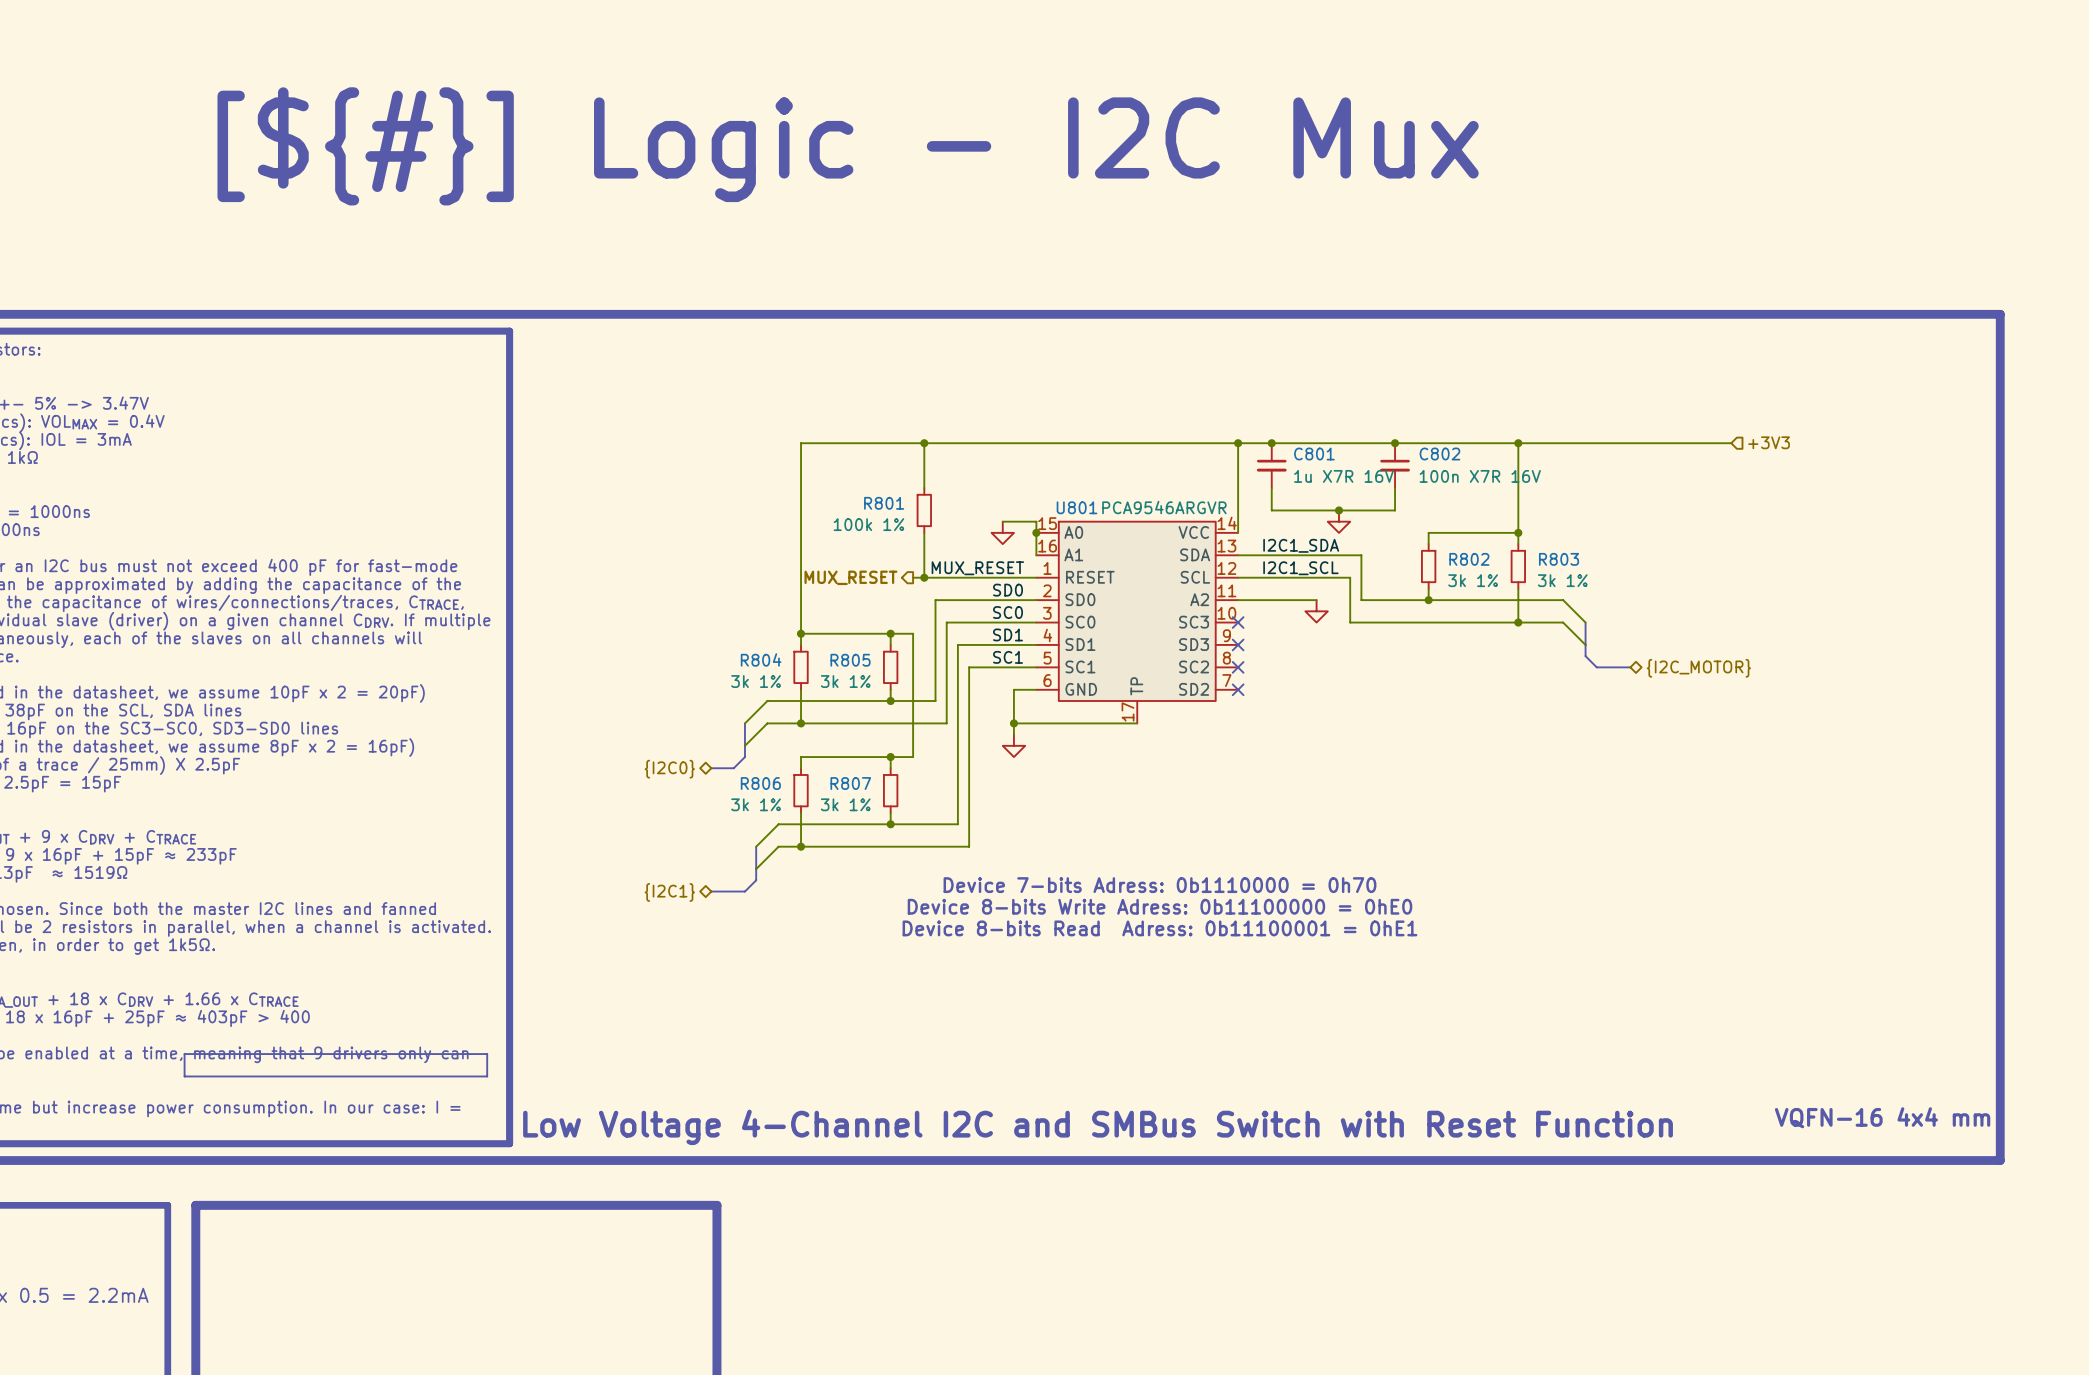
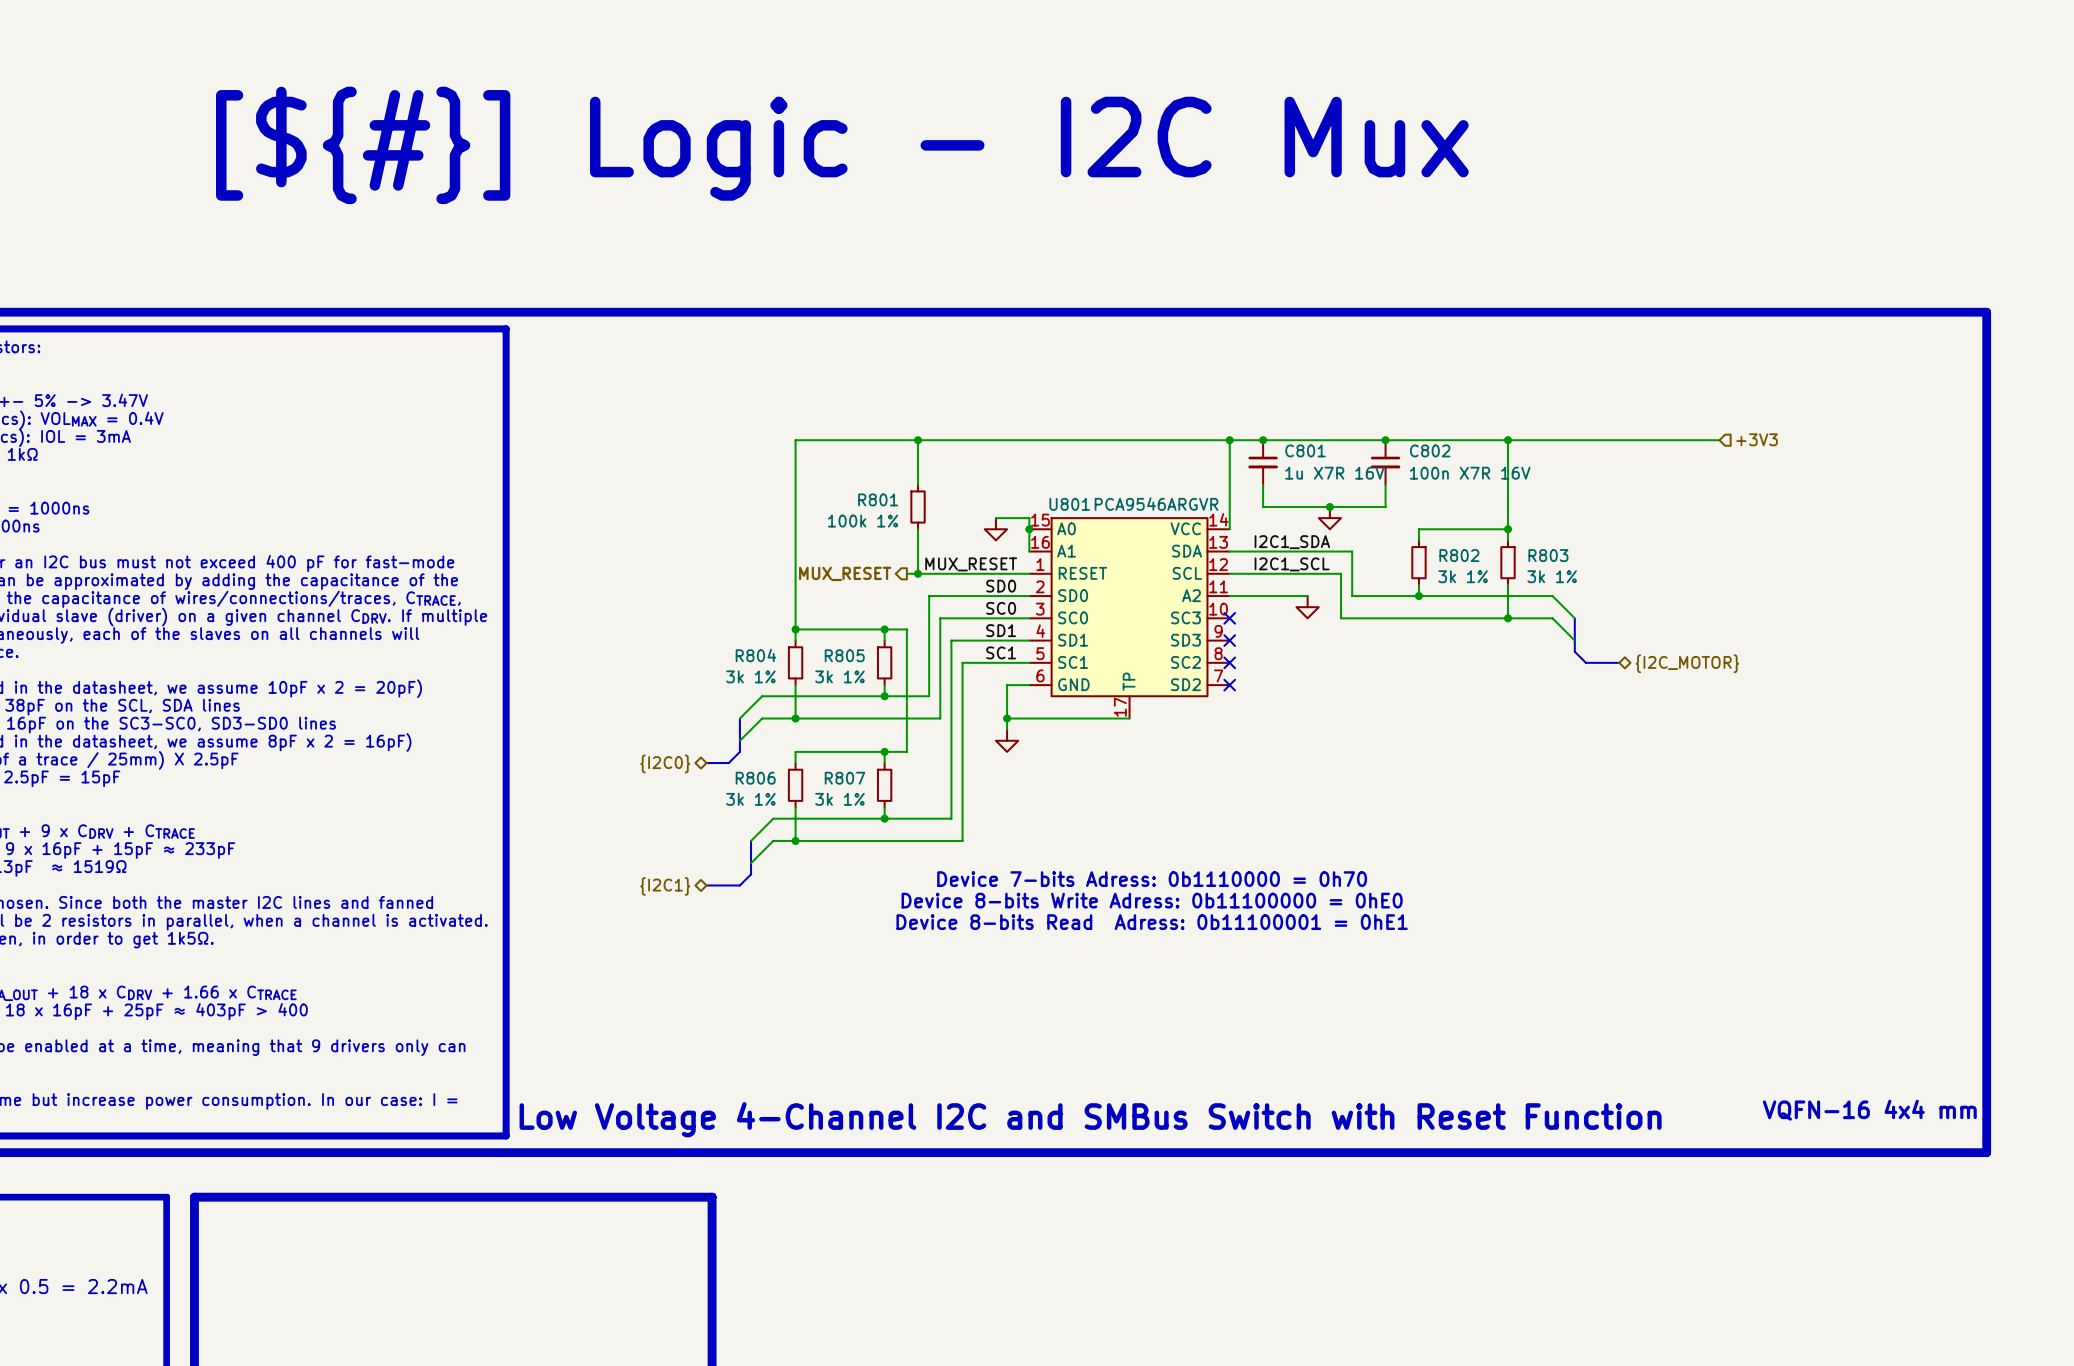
line: (184, 1054) (487, 1054) (487, 1076) (184, 1076) (184, 1054) -> none

